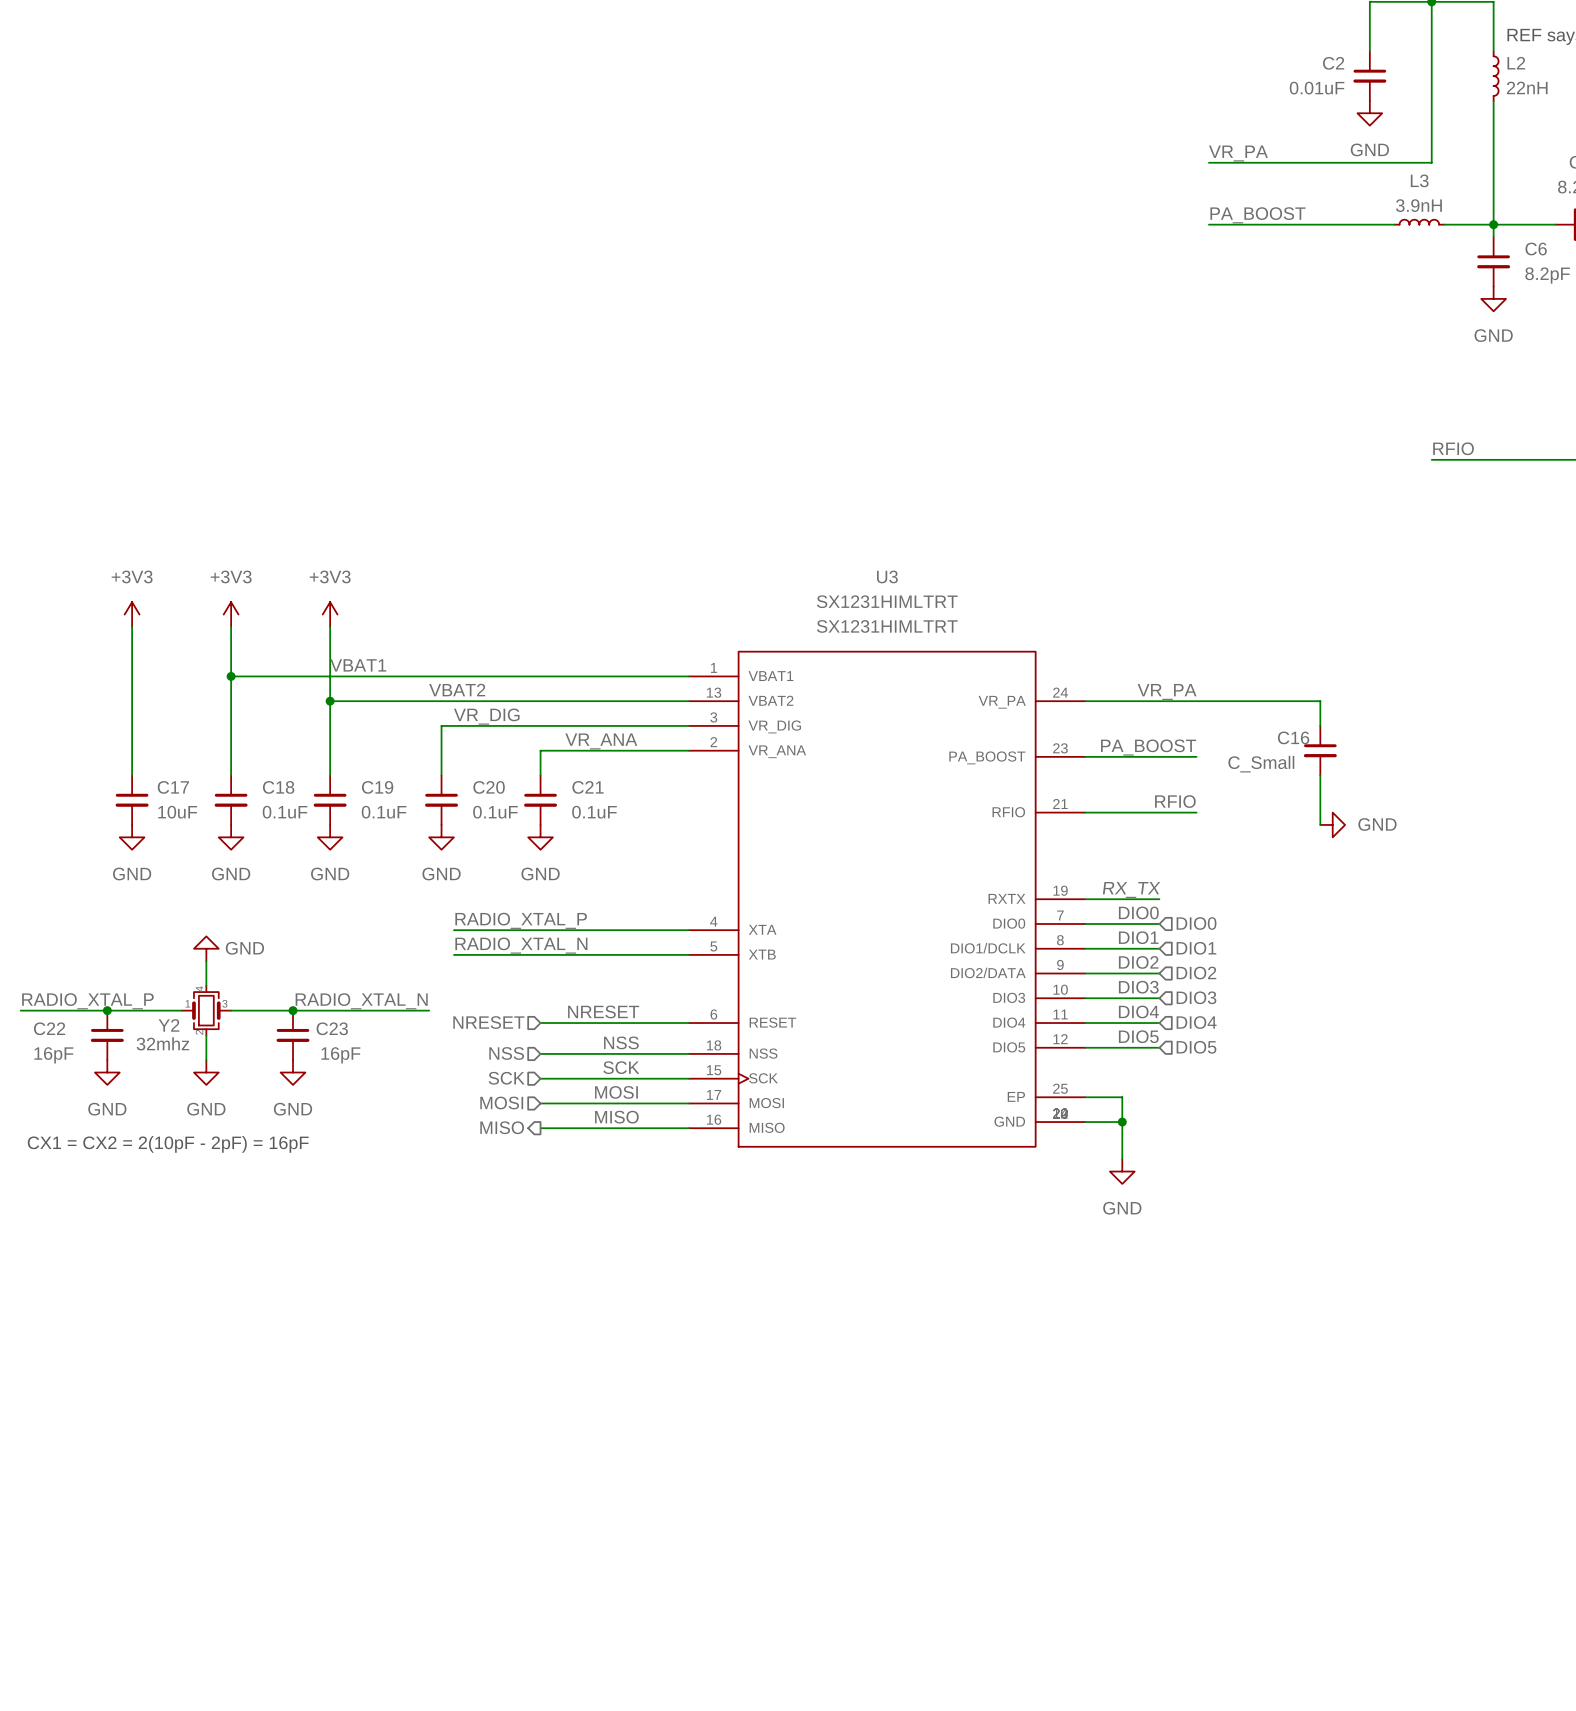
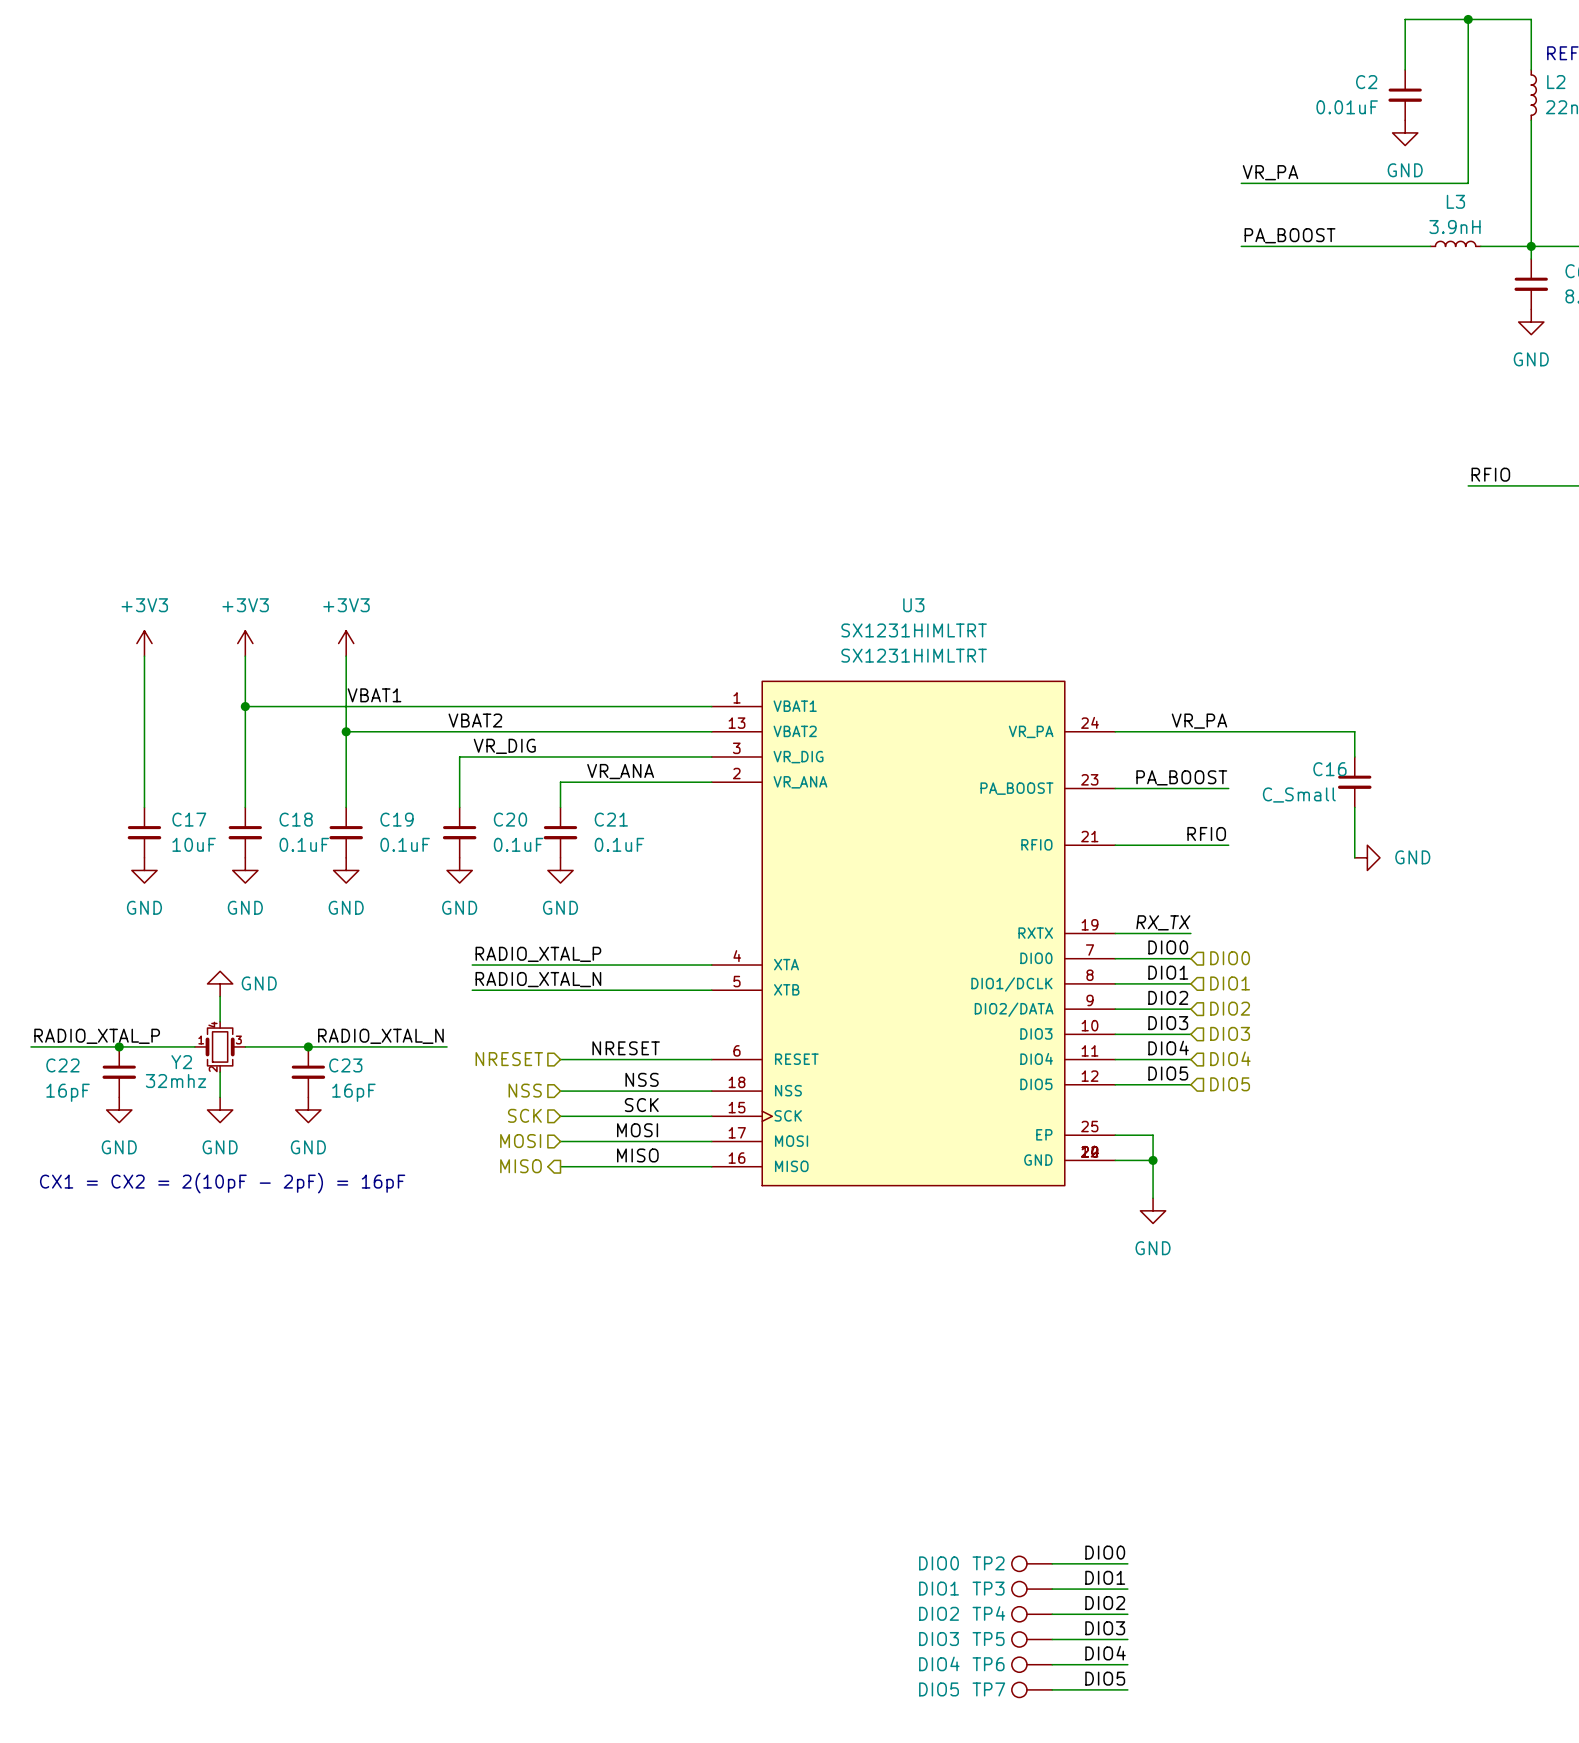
label: none -> DIO0 (1105, 1552)
TP2: none -> DIO0 (1032, 1563)
wire: none -> (1052, 1563) (1127, 1563)
label: none -> DIO1 (1105, 1577)
TP3: none -> DIO1 (1032, 1589)
wire: none -> (1052, 1589) (1127, 1589)
label: none -> DIO2 (1105, 1603)
TP4: none -> DIO2 (1032, 1614)
wire: none -> (1052, 1614) (1127, 1614)
label: none -> DIO3 (1105, 1628)
TP5: none -> DIO3 (1032, 1639)
wire: none -> (1052, 1639) (1127, 1639)
label: none -> DIO4 (1105, 1653)
TP6: none -> DIO4 (1032, 1664)
wire: none -> (1052, 1664) (1127, 1664)
label: none -> DIO5 (1105, 1678)
TP7: none -> DIO5 (1032, 1689)
wire: none -> (1052, 1689) (1127, 1689)

